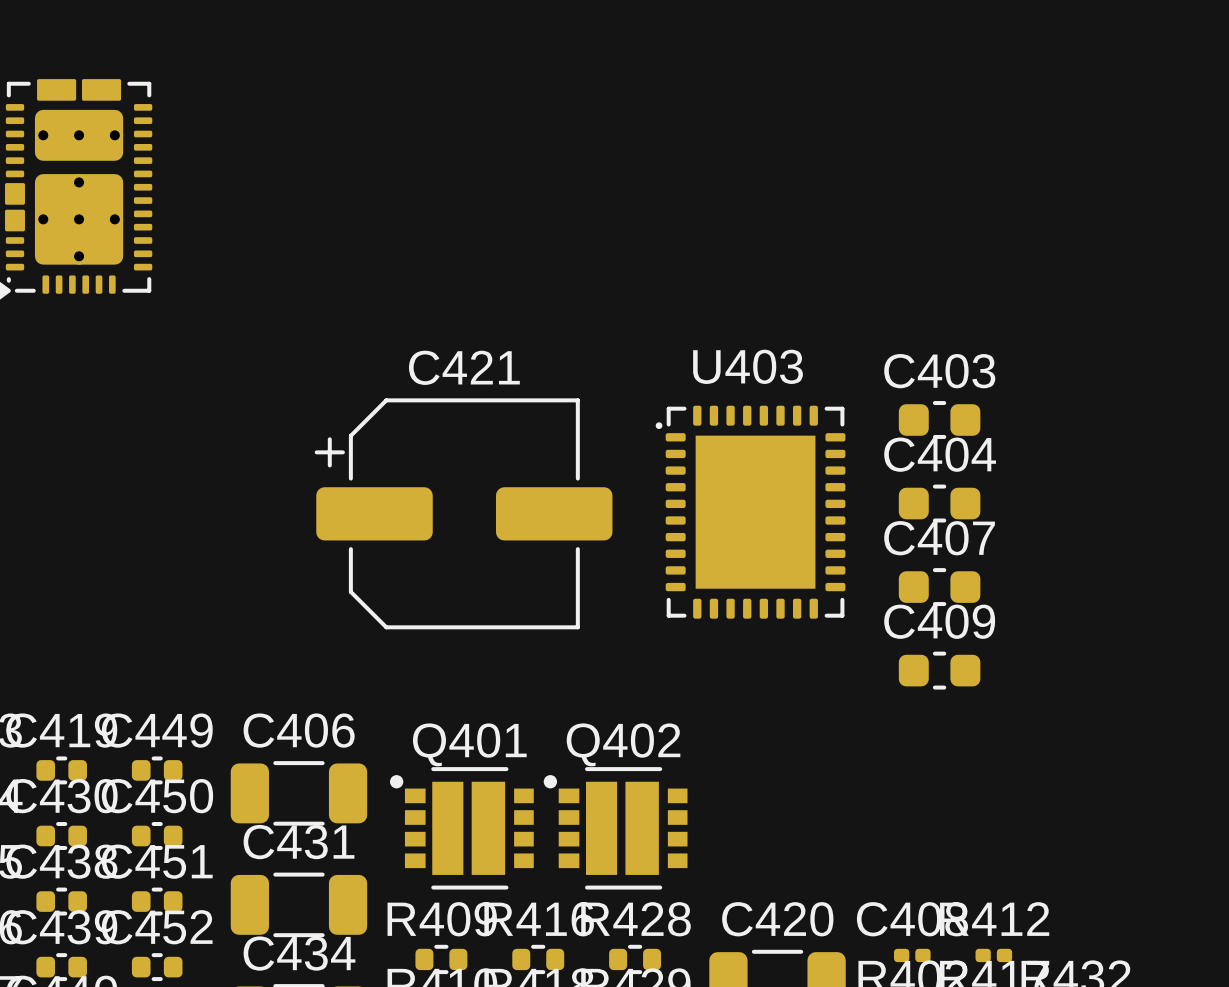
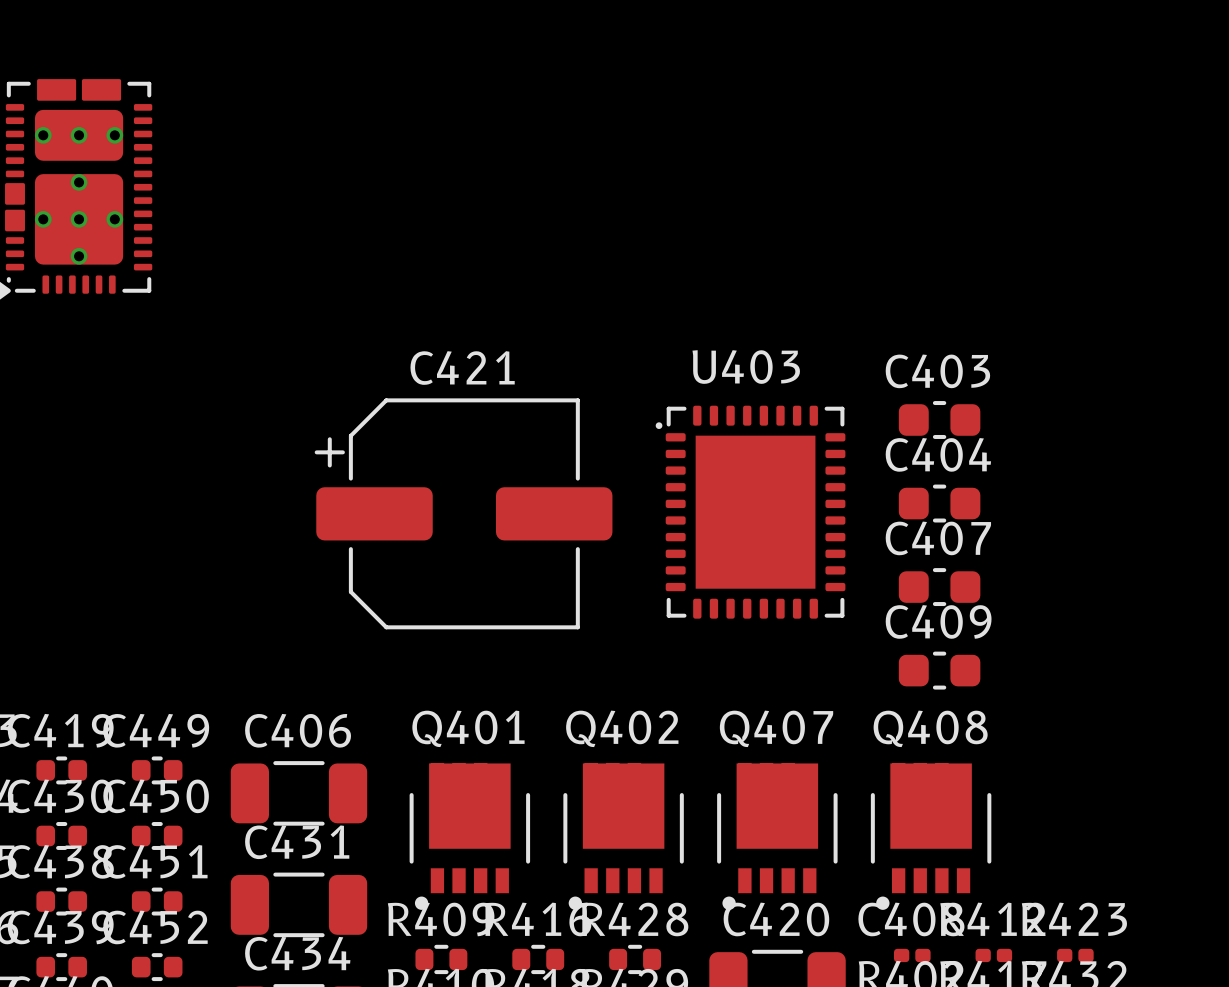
Q401 footprint: [389, 767, 534, 890] -> [409, 763, 531, 910]
Q402 footprint: [543, 767, 688, 890] -> [563, 763, 684, 910]
Q407: none -> (777, 836)
Q408: none -> (931, 836)
R423: none -> (1075, 955)

